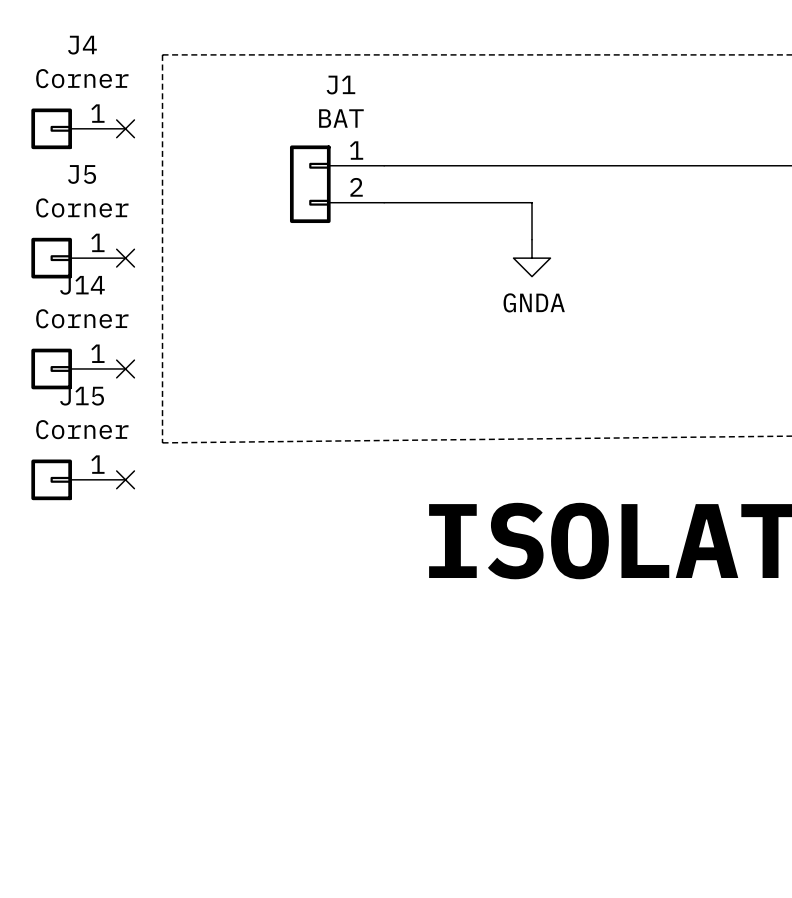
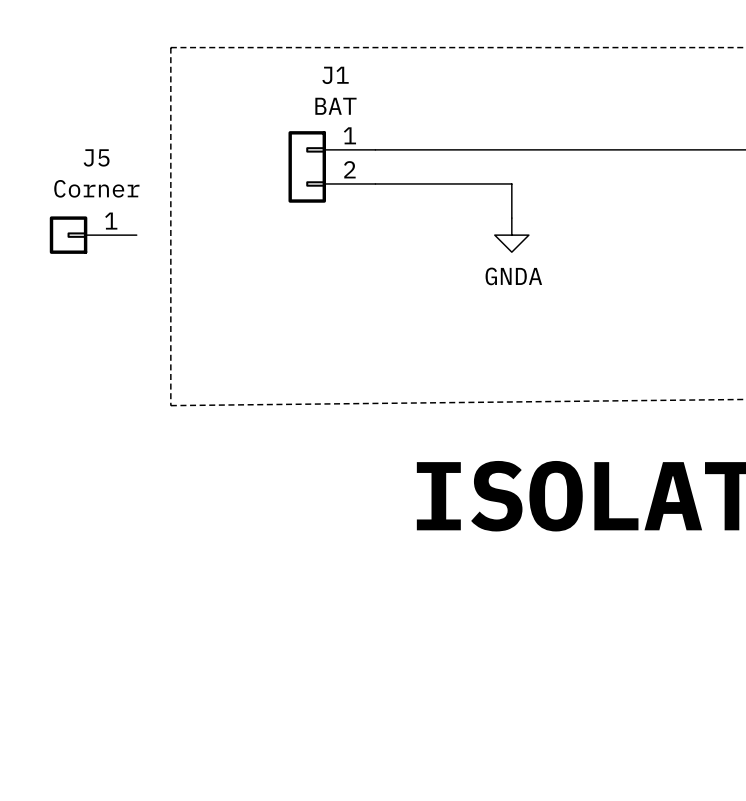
J4: Corner (78, 128) -> none
no-connect mark: (125, 128) -> none
no-connect mark: (125, 258) -> none
J14: Corner (78, 368) -> none
no-connect mark: (125, 368) -> none
J15: Corner (78, 479) -> none
no-connect mark: (125, 479) -> none

